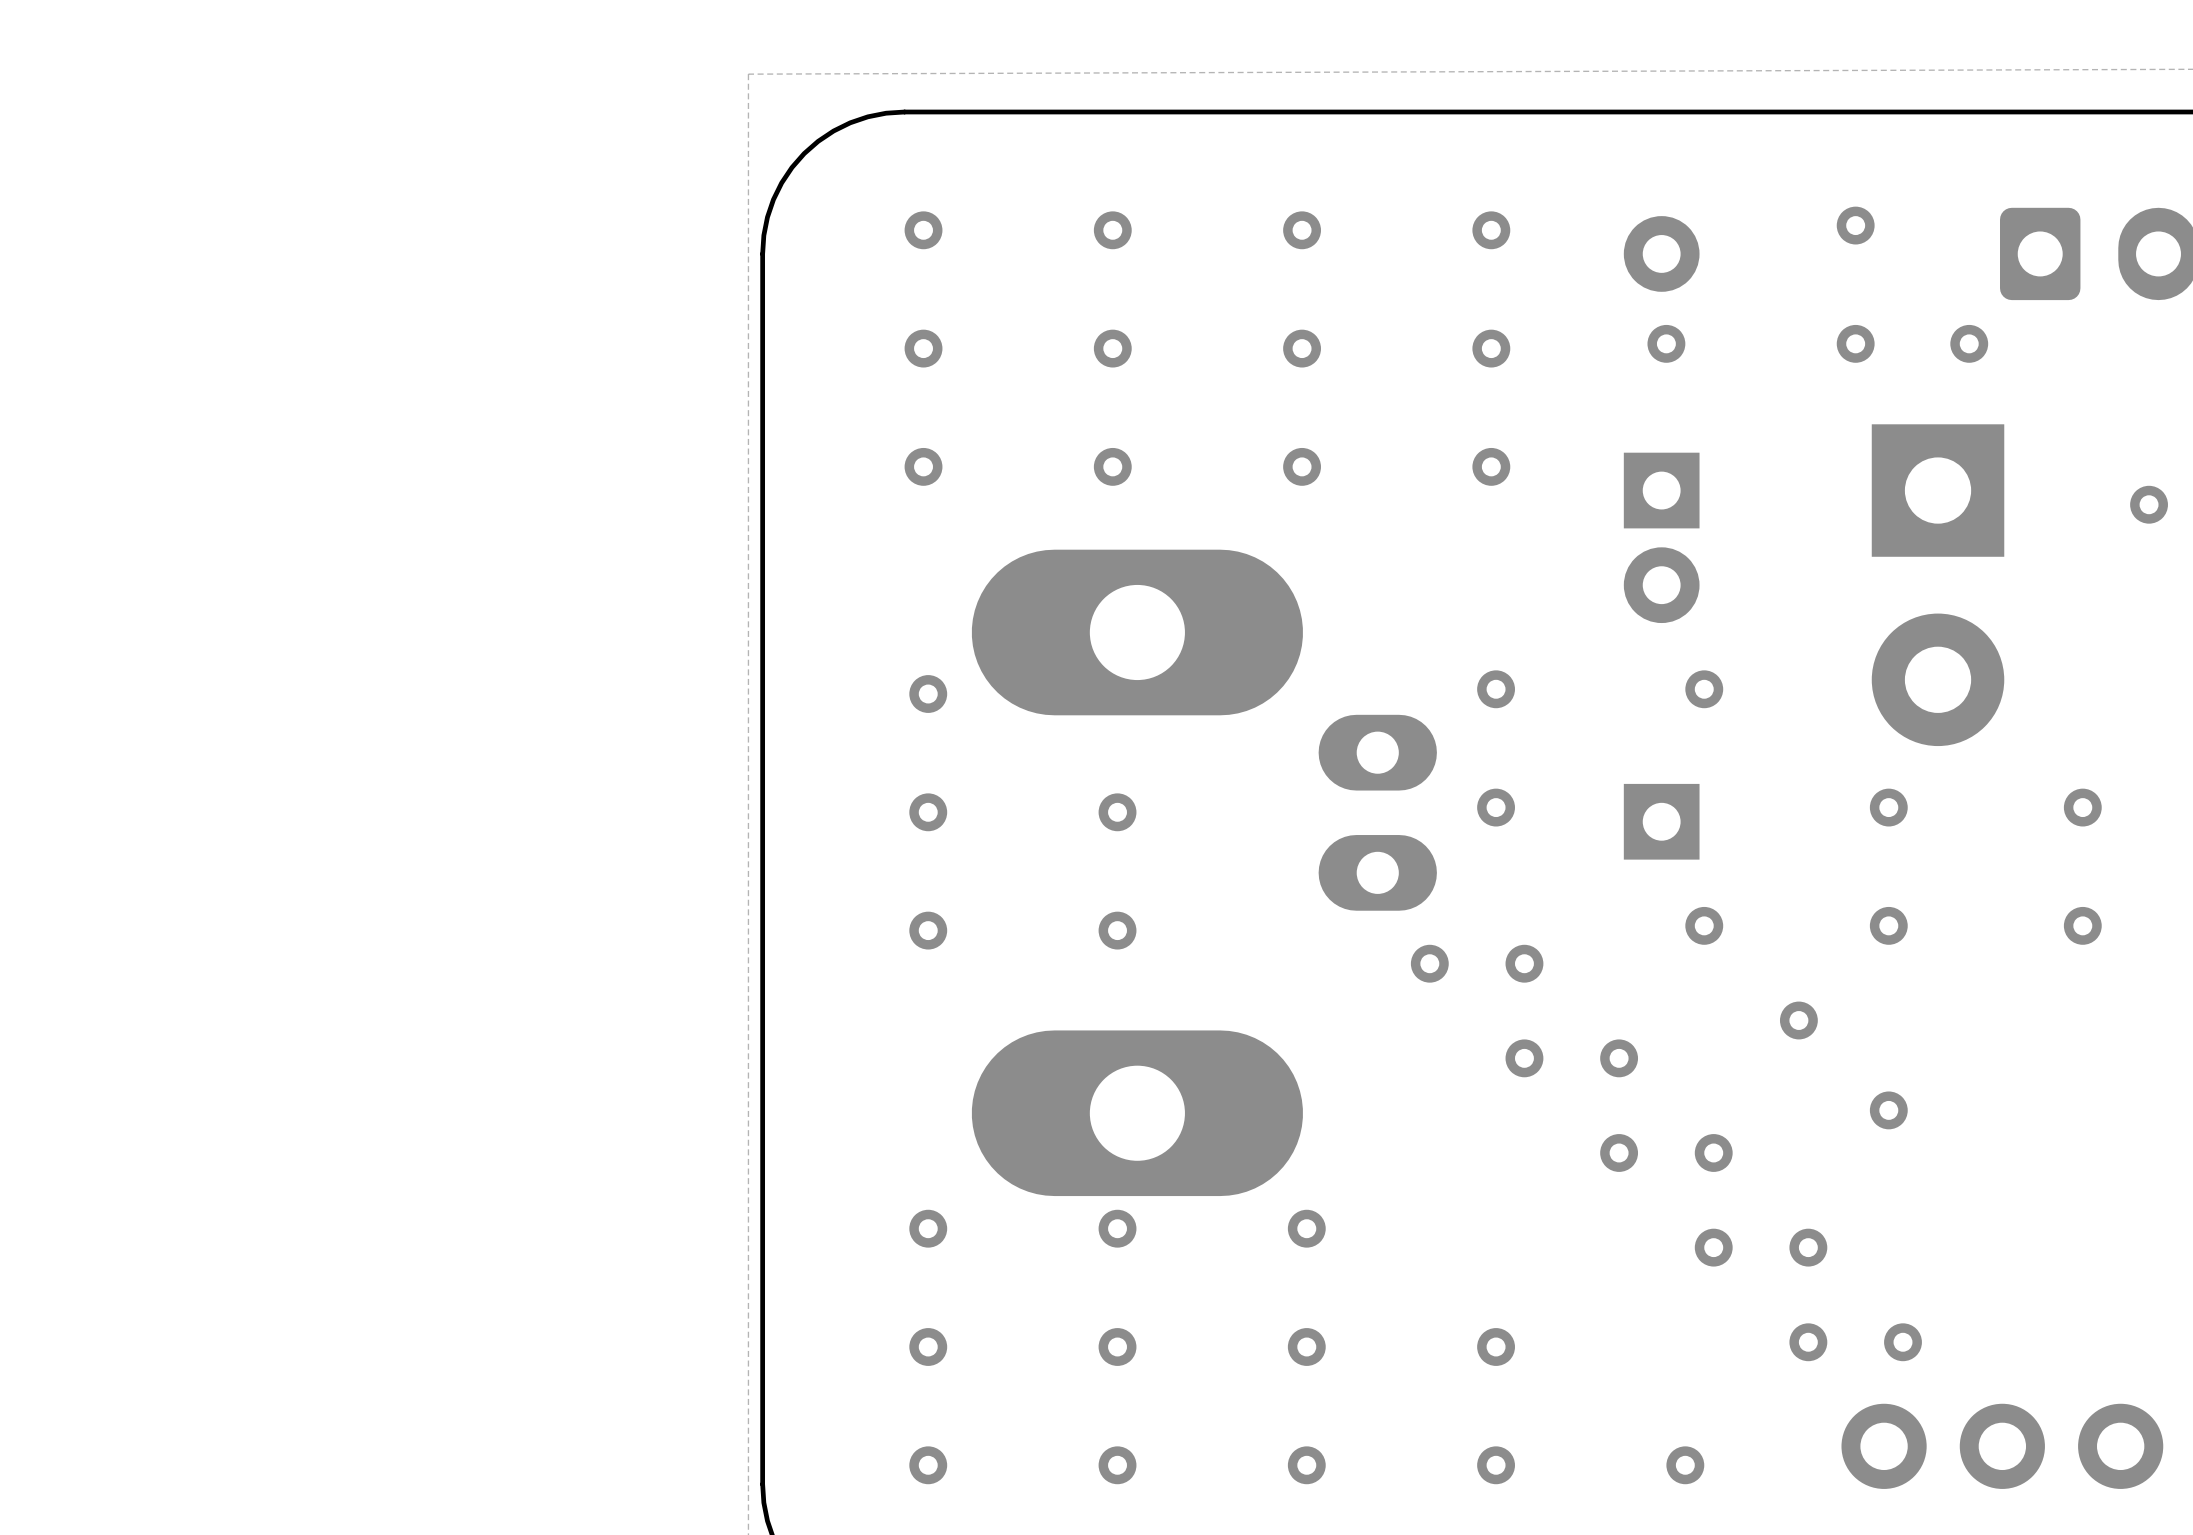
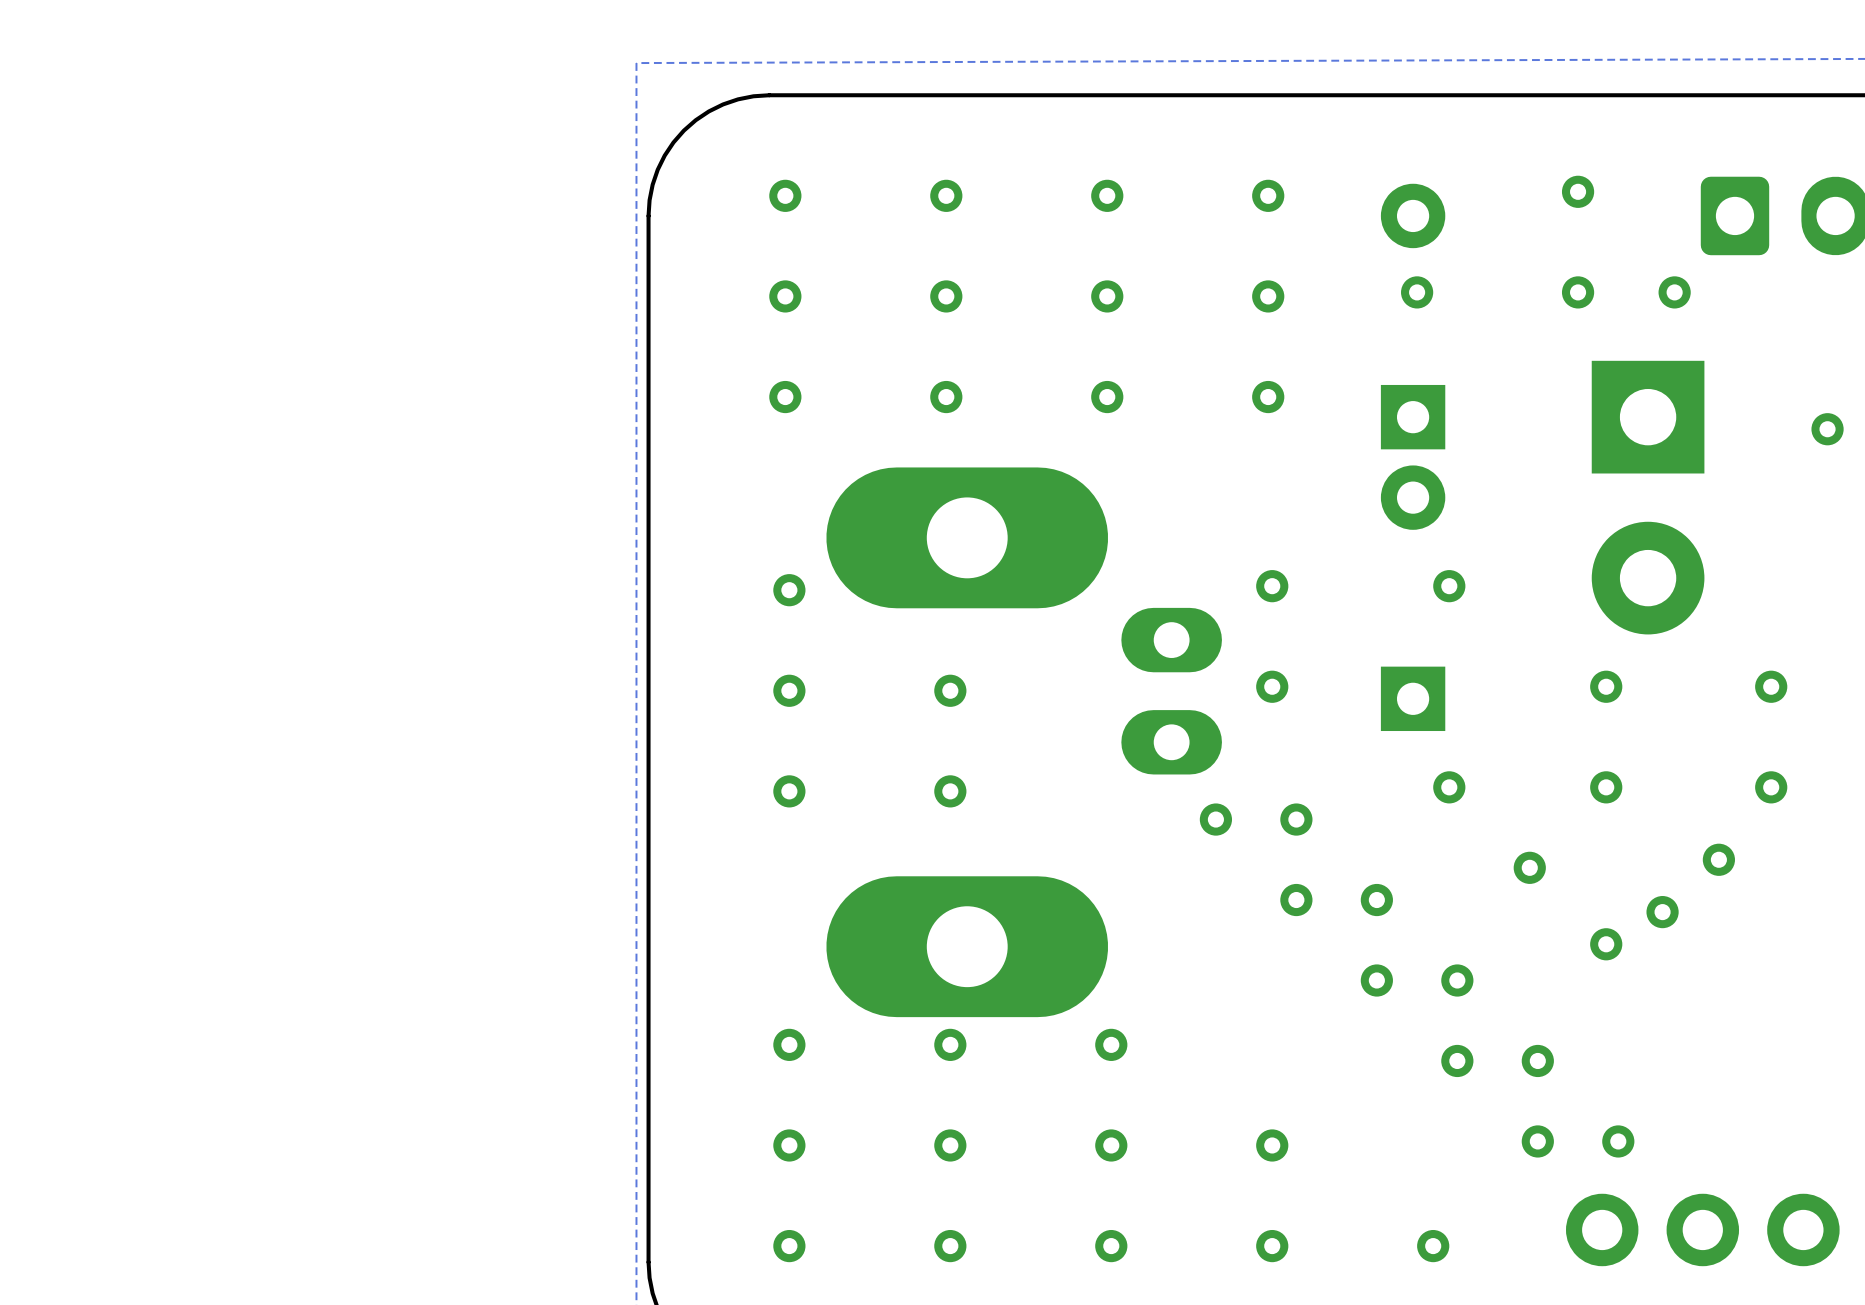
via: none -> (1718, 859)
via: none -> (1662, 912)

